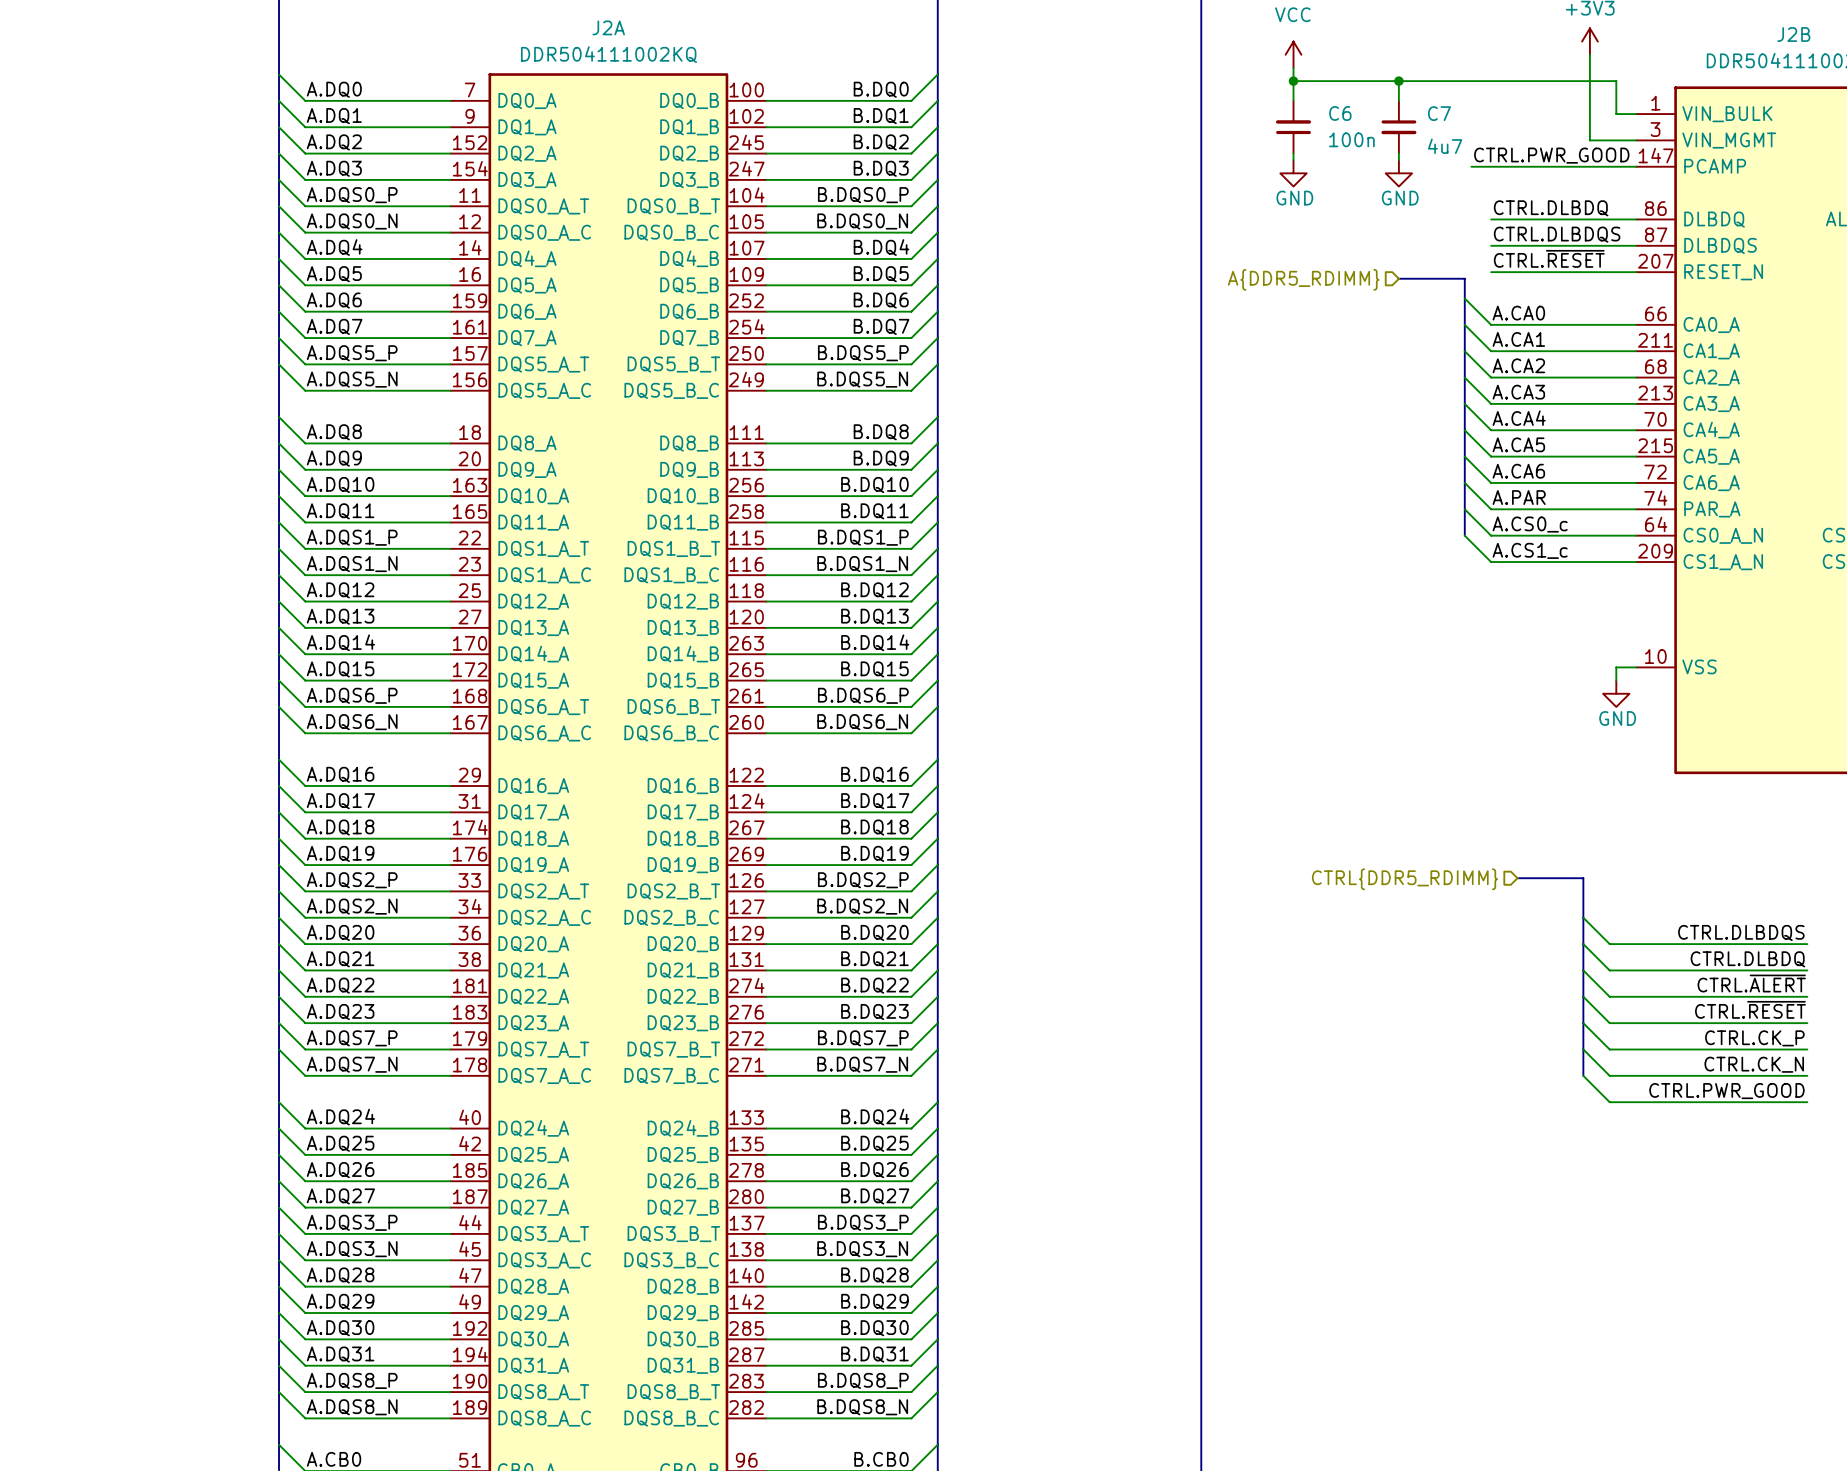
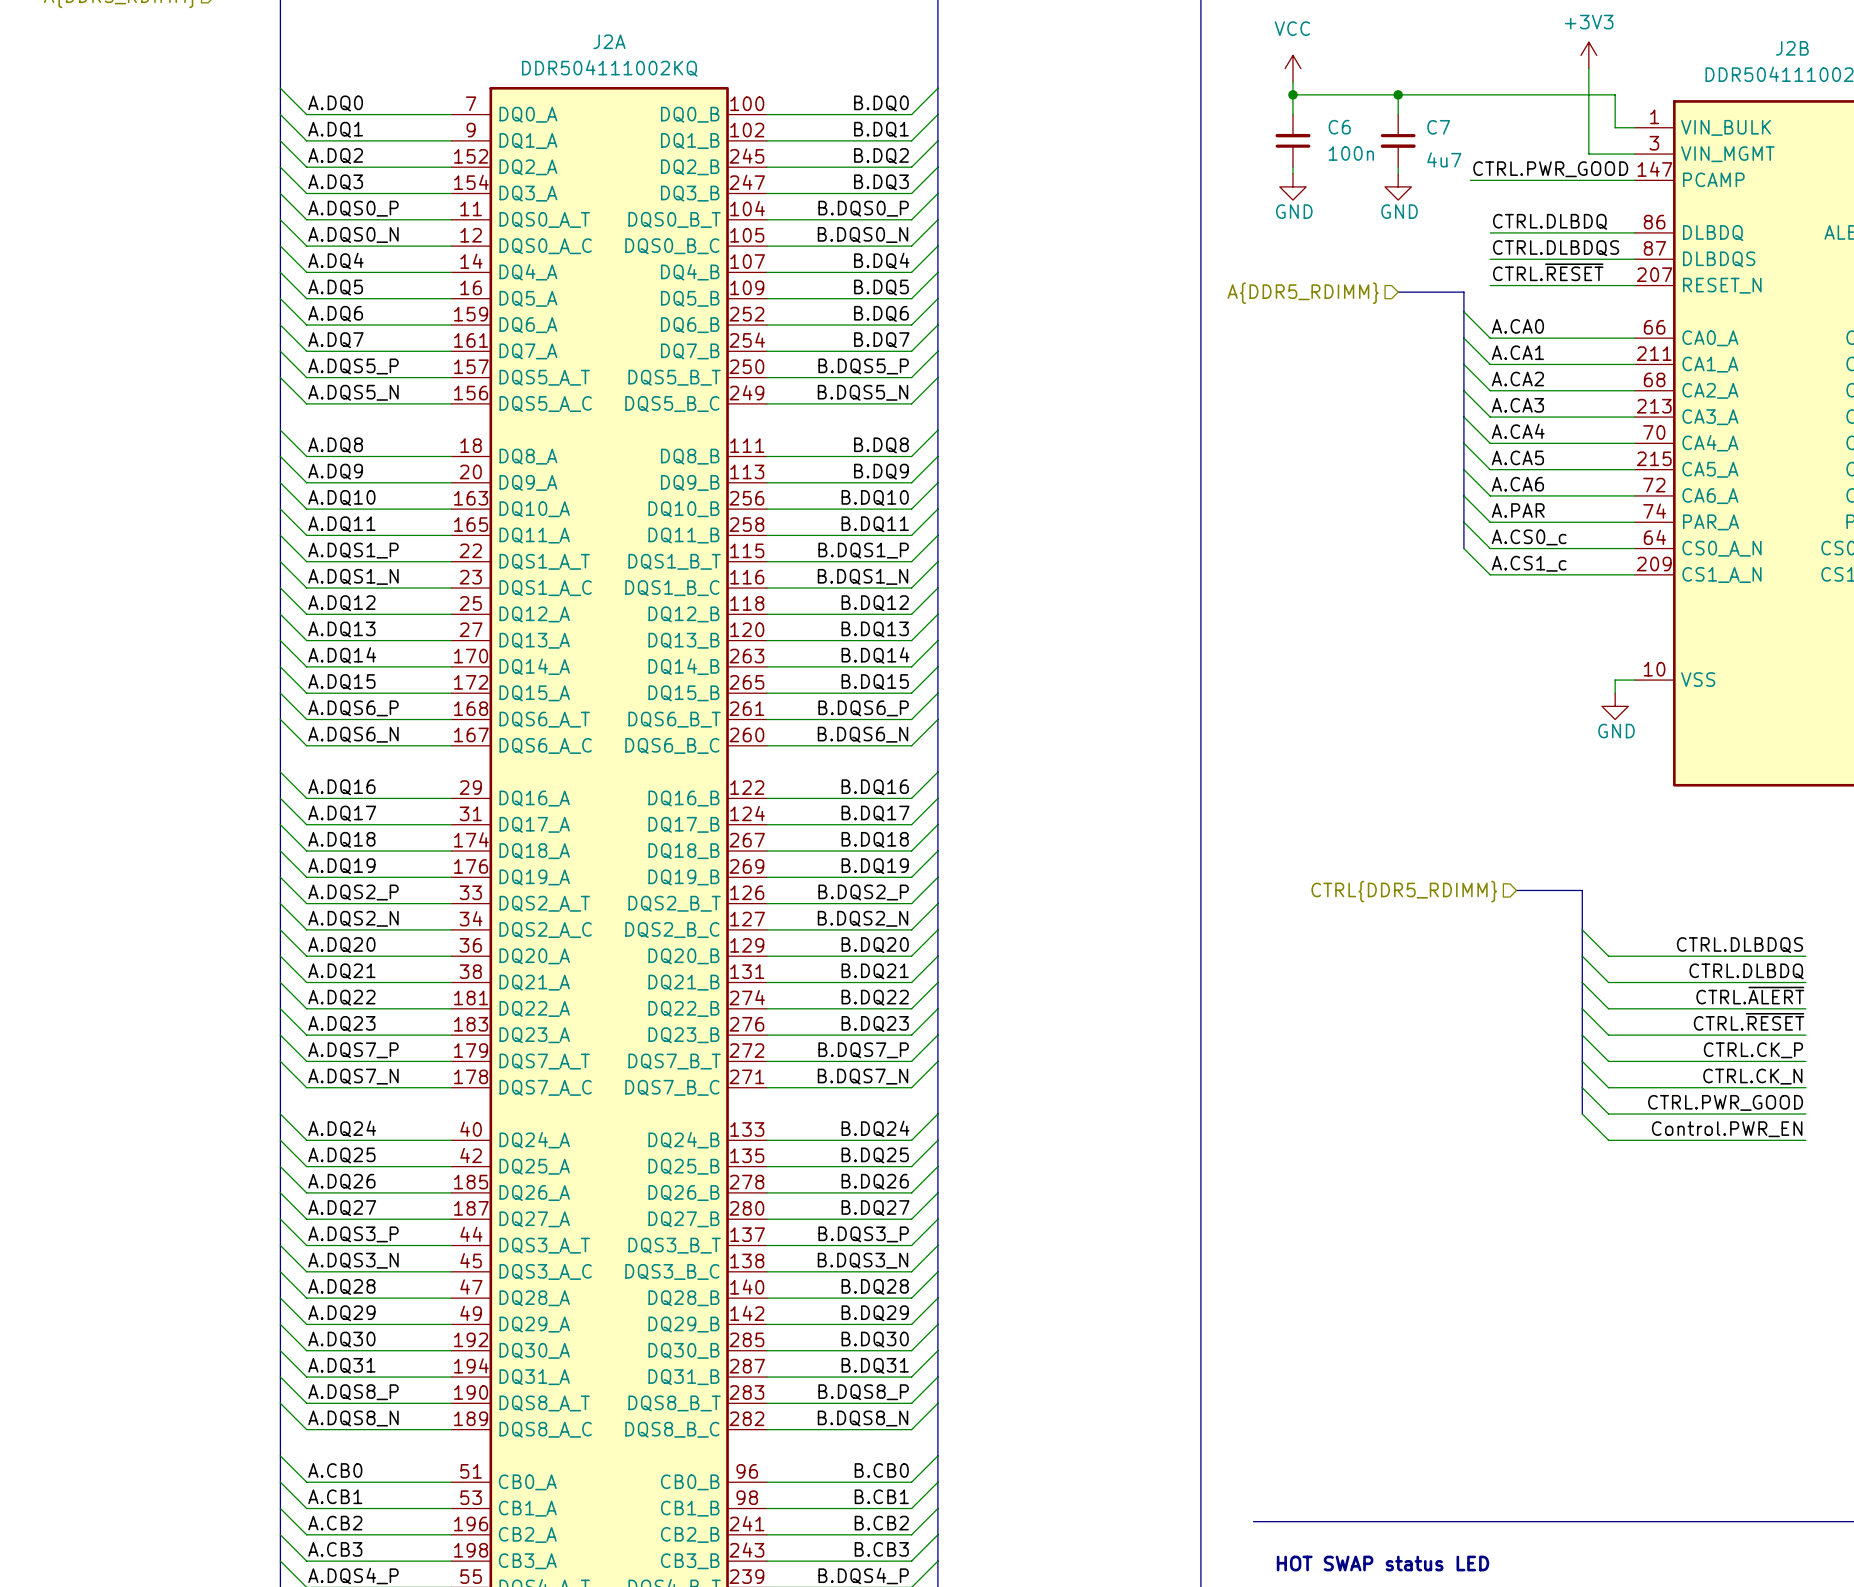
bus: none -> (1582, 1087) (1582, 1114)
wire: none -> (1582, 1114) (1608, 1140) (1805, 1140)
label: none -> Control.PWR_EN (1727, 1129)

